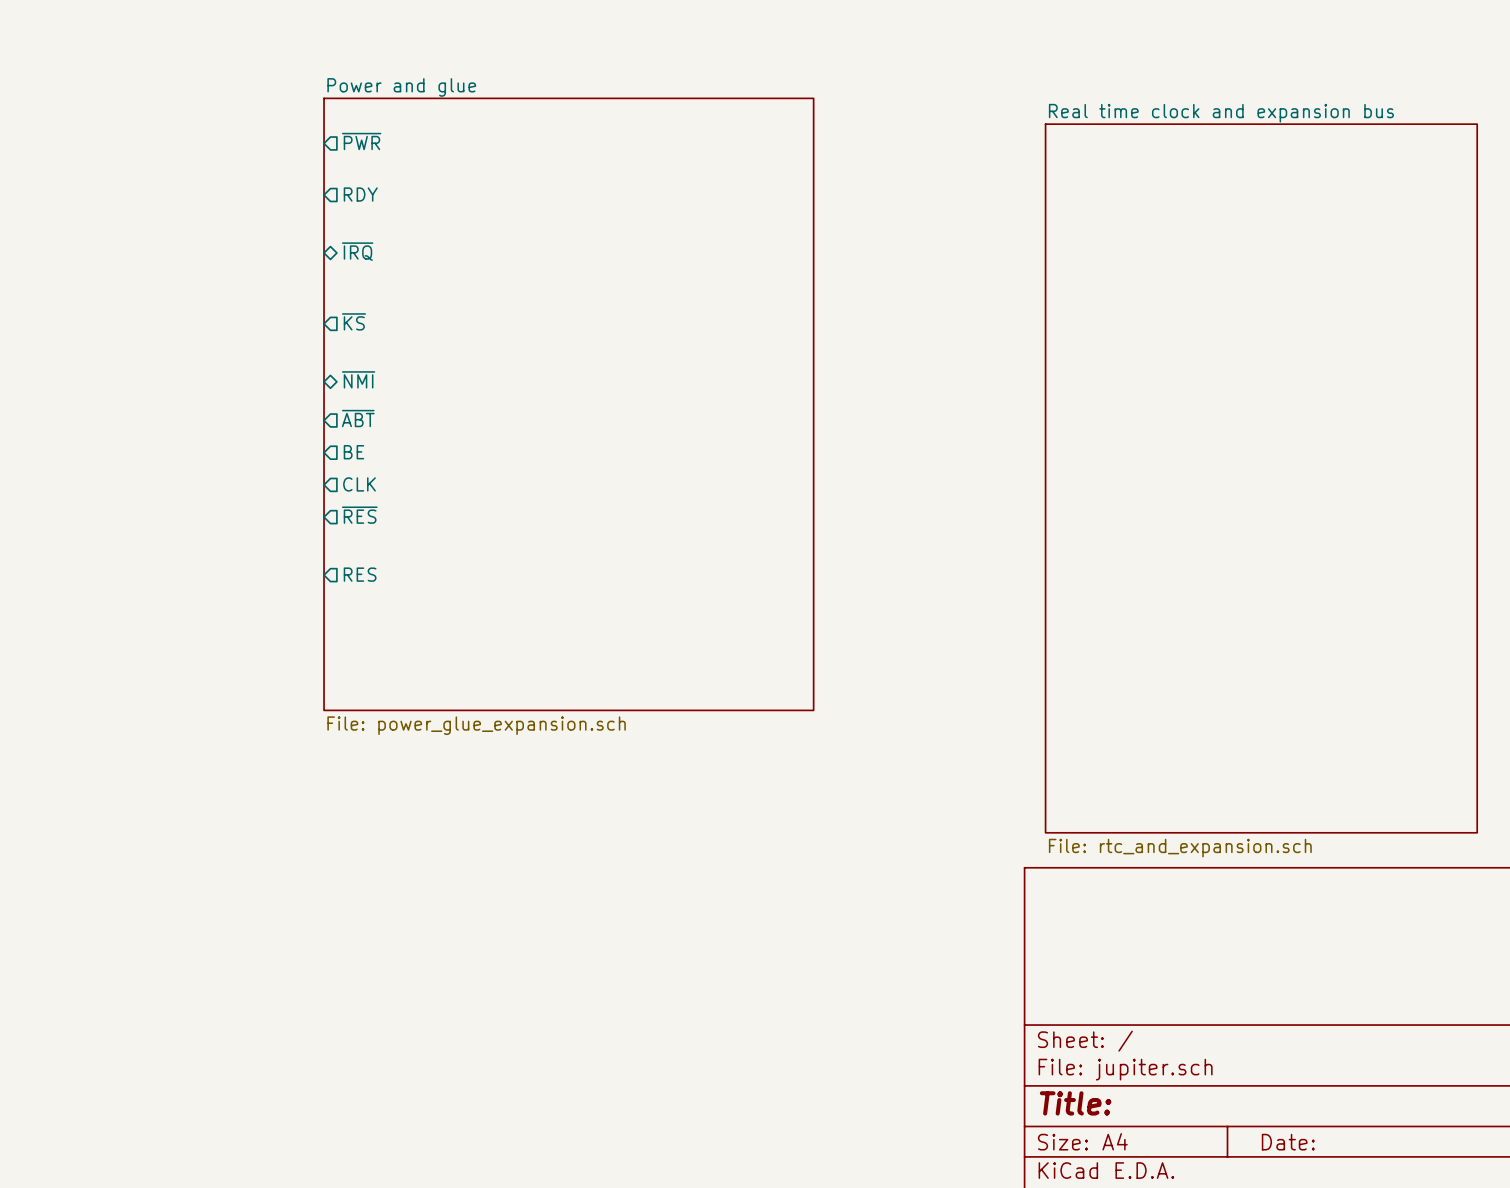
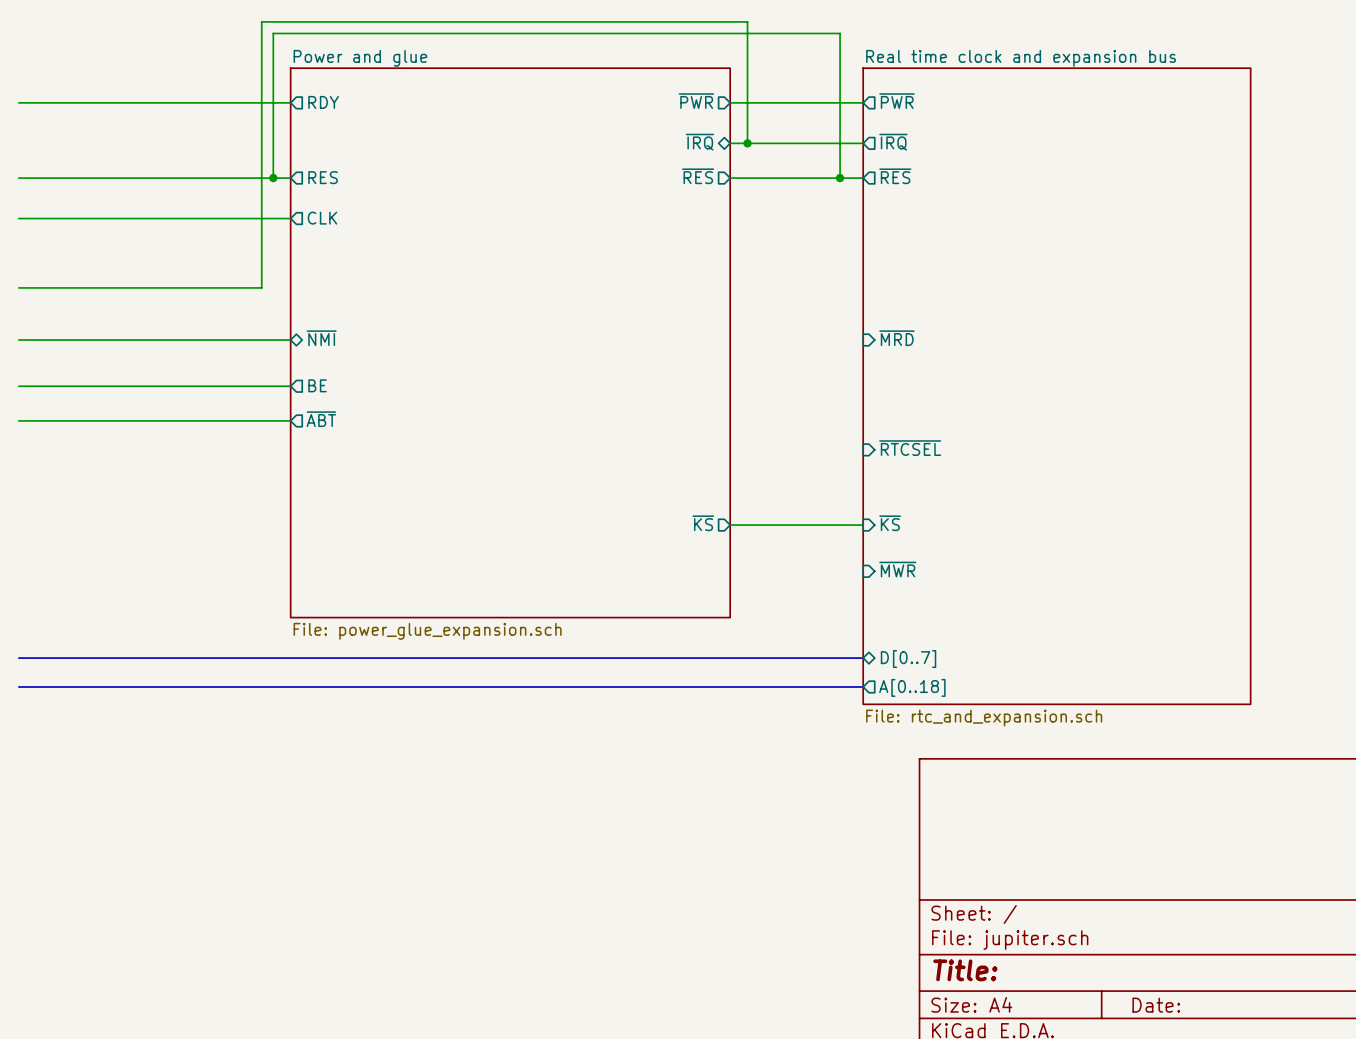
sheet pin: none -> ~{PWR} (696, 101)
sheet pin: none -> ~{PWR} (896, 101)
wire: none -> (18, 102) (290, 102)
wire: none -> (730, 102) (863, 102)
sheet pin: ~{PWR} (361, 141) -> none
sheet pin: none -> ~{IRQ} (699, 142)
sheet pin: none -> ~{IRQ} (893, 142)
wire: none -> (730, 143) (863, 143)
wire: none -> (747, 143) (747, 21) (261, 21) (261, 287) (18, 287)
junction: none -> (747, 143)
sheet pin position: RDY (360, 194) -> RDY (323, 102)
sheet pin: none -> ~{RES} (698, 176)
sheet pin: none -> ~{RES} (895, 176)
wire: none -> (18, 178) (290, 178)
wire: none -> (273, 178) (273, 33) (840, 33) (840, 178)
junction: none -> (273, 178)
sheet pin: none -> RES (323, 177)
wire: none -> (730, 178) (863, 178)
junction: none -> (840, 178)
sheet pin: ~{IRQ} (357, 251) -> none
wire: none -> (18, 218) (290, 218)
sheet pin: ~{KS} (353, 321) -> none
sheet pin position: ~{NMI} (358, 379) -> ~{NMI} (321, 338)
sheet pin: none -> ~{MRD} (896, 338)
wire: none -> (18, 339) (290, 339)
sheet pin position: ~{ABT} (358, 418) -> ~{ABT} (321, 419)
wire: none -> (18, 386) (290, 386)
sheet Real time clock and expansion bus position: (1261, 478) -> (1056, 386)
sheet pin position: CLK (359, 484) -> CLK (322, 218)
wire: none -> (18, 420) (290, 420)
sheet pin: ~{RES} (359, 515) -> none
sheet pin: none -> ~{RTCSEL} (910, 448)
sheet pin: RES (360, 574) -> none
sheet pin: none -> ~{KS} (703, 523)
sheet pin: none -> ~{KS} (890, 523)
wire: none -> (730, 525) (863, 525)
sheet pin: none -> ~{MWR} (897, 569)
bus: none -> (18, 658) (863, 658)
sheet pin: none -> D[0..7] (908, 659)
bus: none -> (18, 686) (863, 686)
sheet pin: none -> A[0..18] (912, 687)

